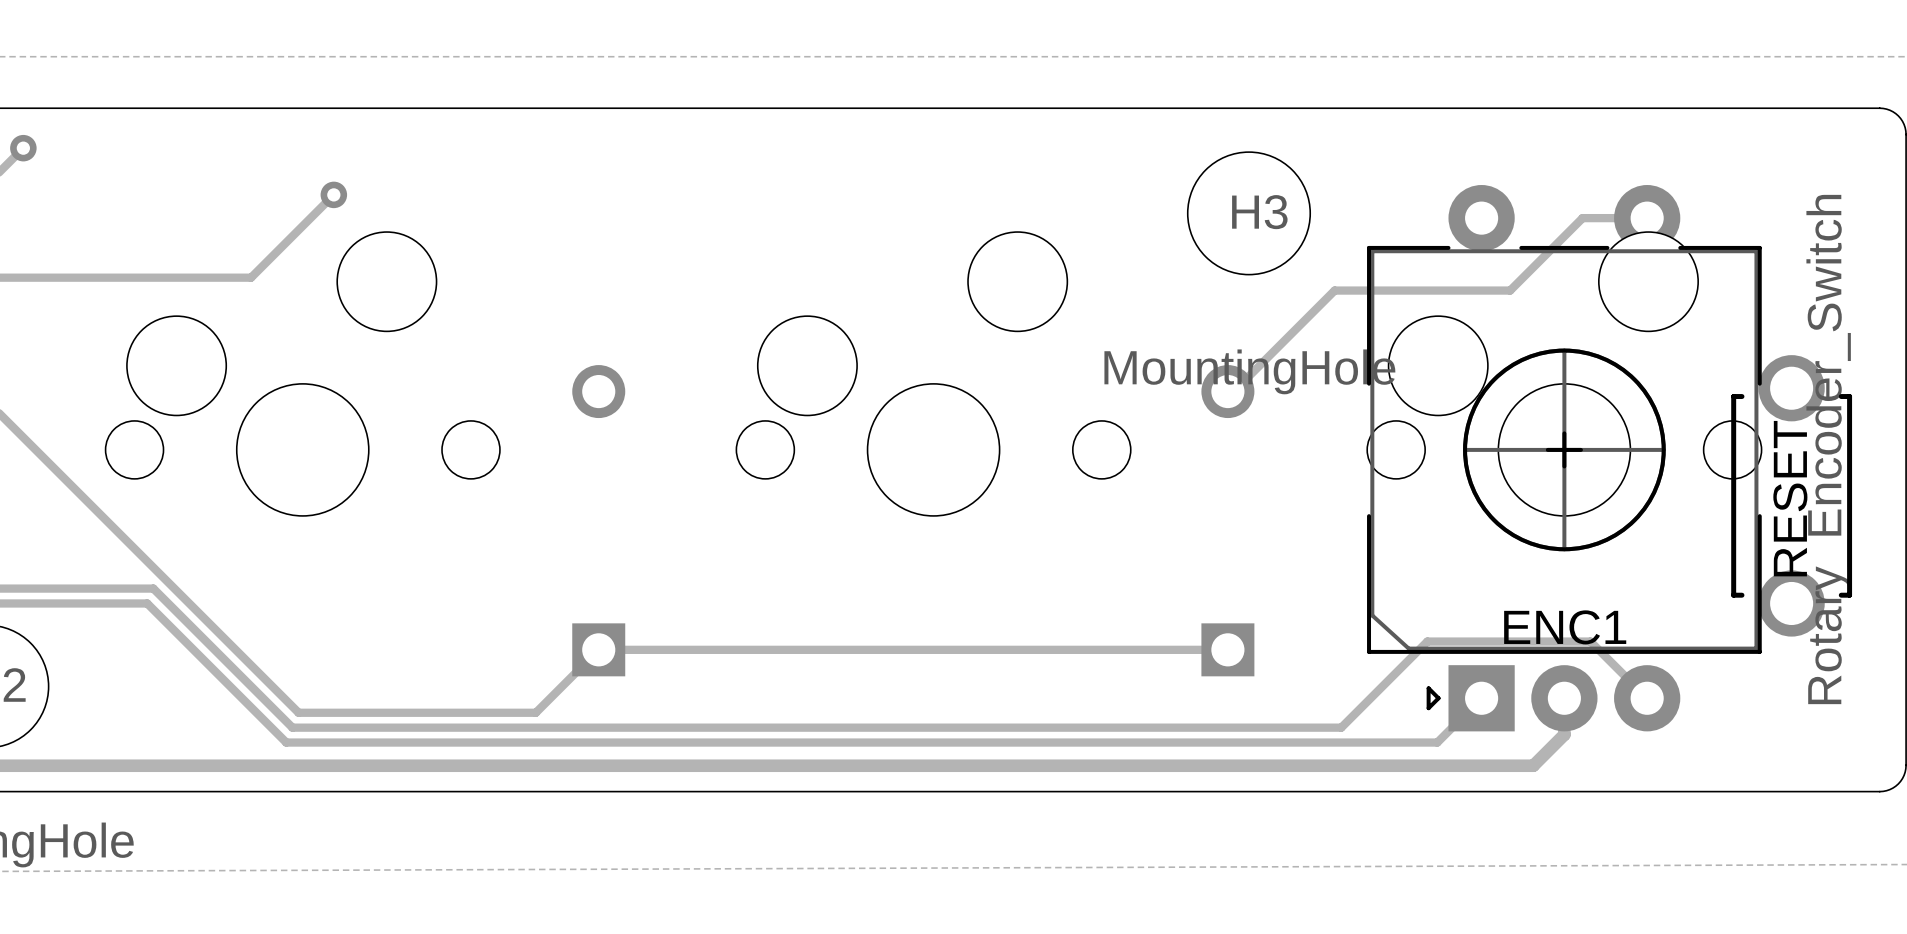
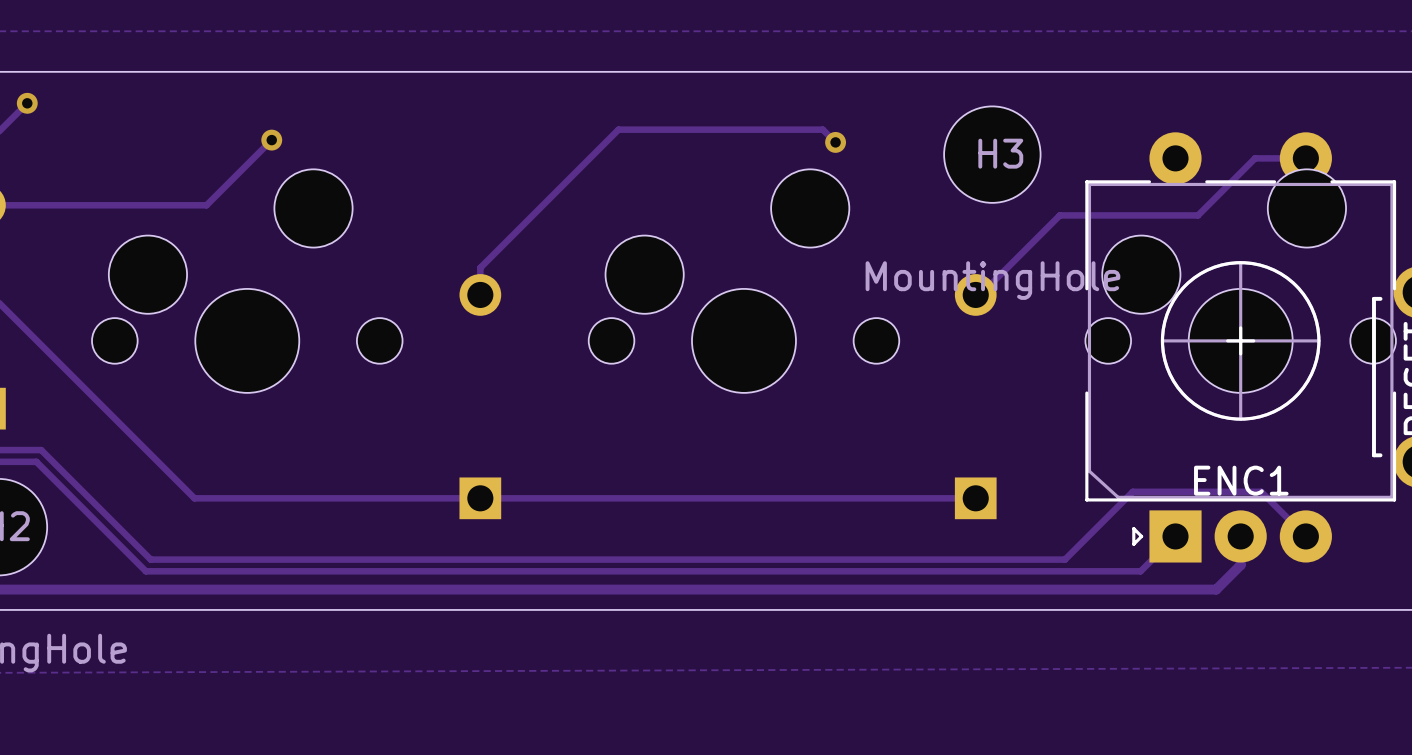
track: none -> (835, 142) (822, 129) (618, 129) (480, 267) (480, 294)
via: none -> (835, 142)
track: (41, 588) (153, 588) (292, 727) -> (41, 450) (150, 559) (239, 559)
track: (34, 603) (147, 603) (286, 742) -> (36, 461) (145, 571) (234, 571)
track: (235, 649) (298, 712) (535, 712) (598, 649) -> (194, 498) (480, 498)

